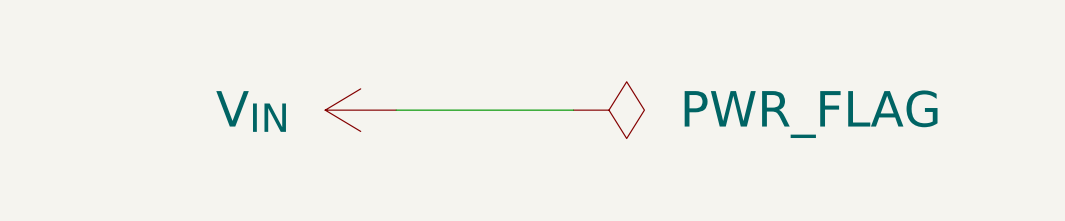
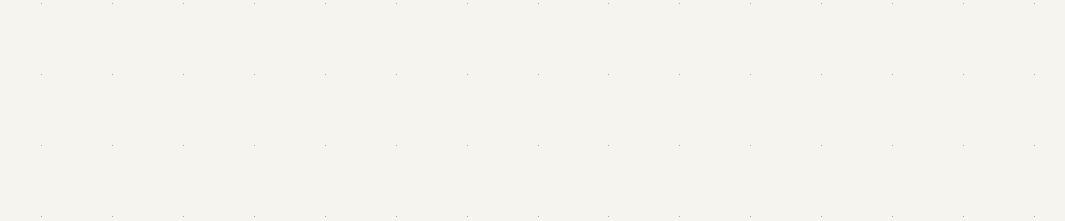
power symbol: VIN (360, 110) -> none
wire: (396, 110) (573, 110) -> none
power symbol: PWR_FLAG (608, 110) -> none

